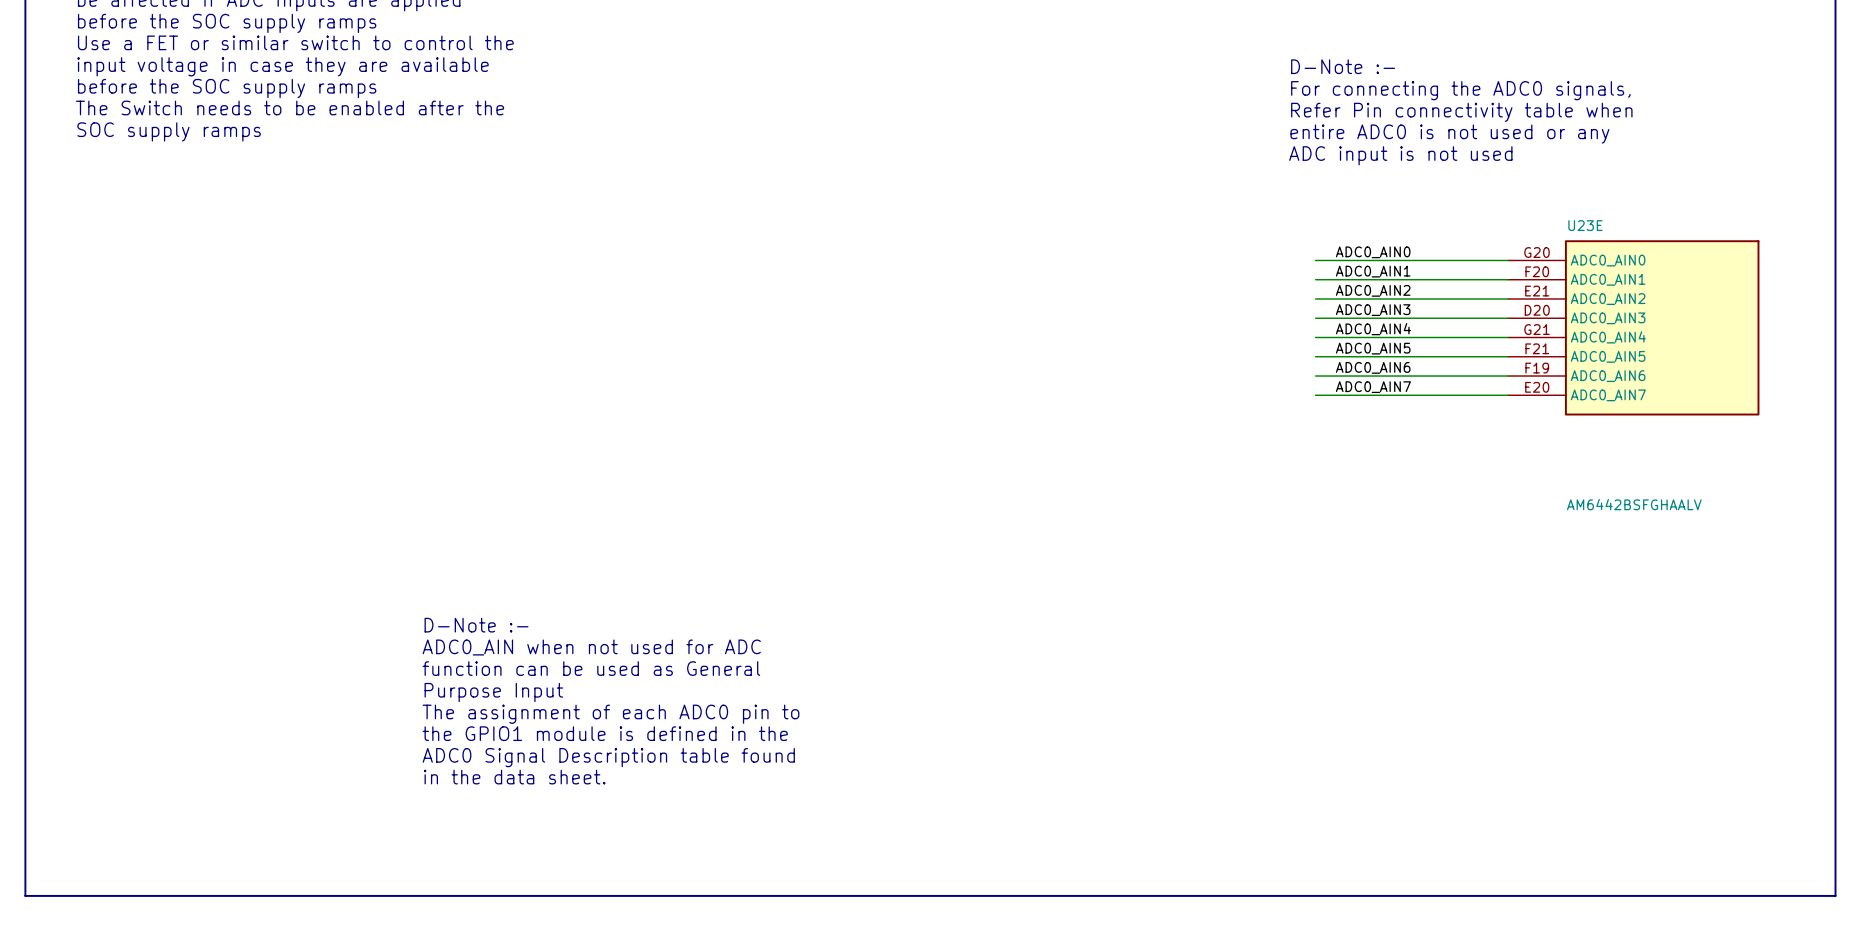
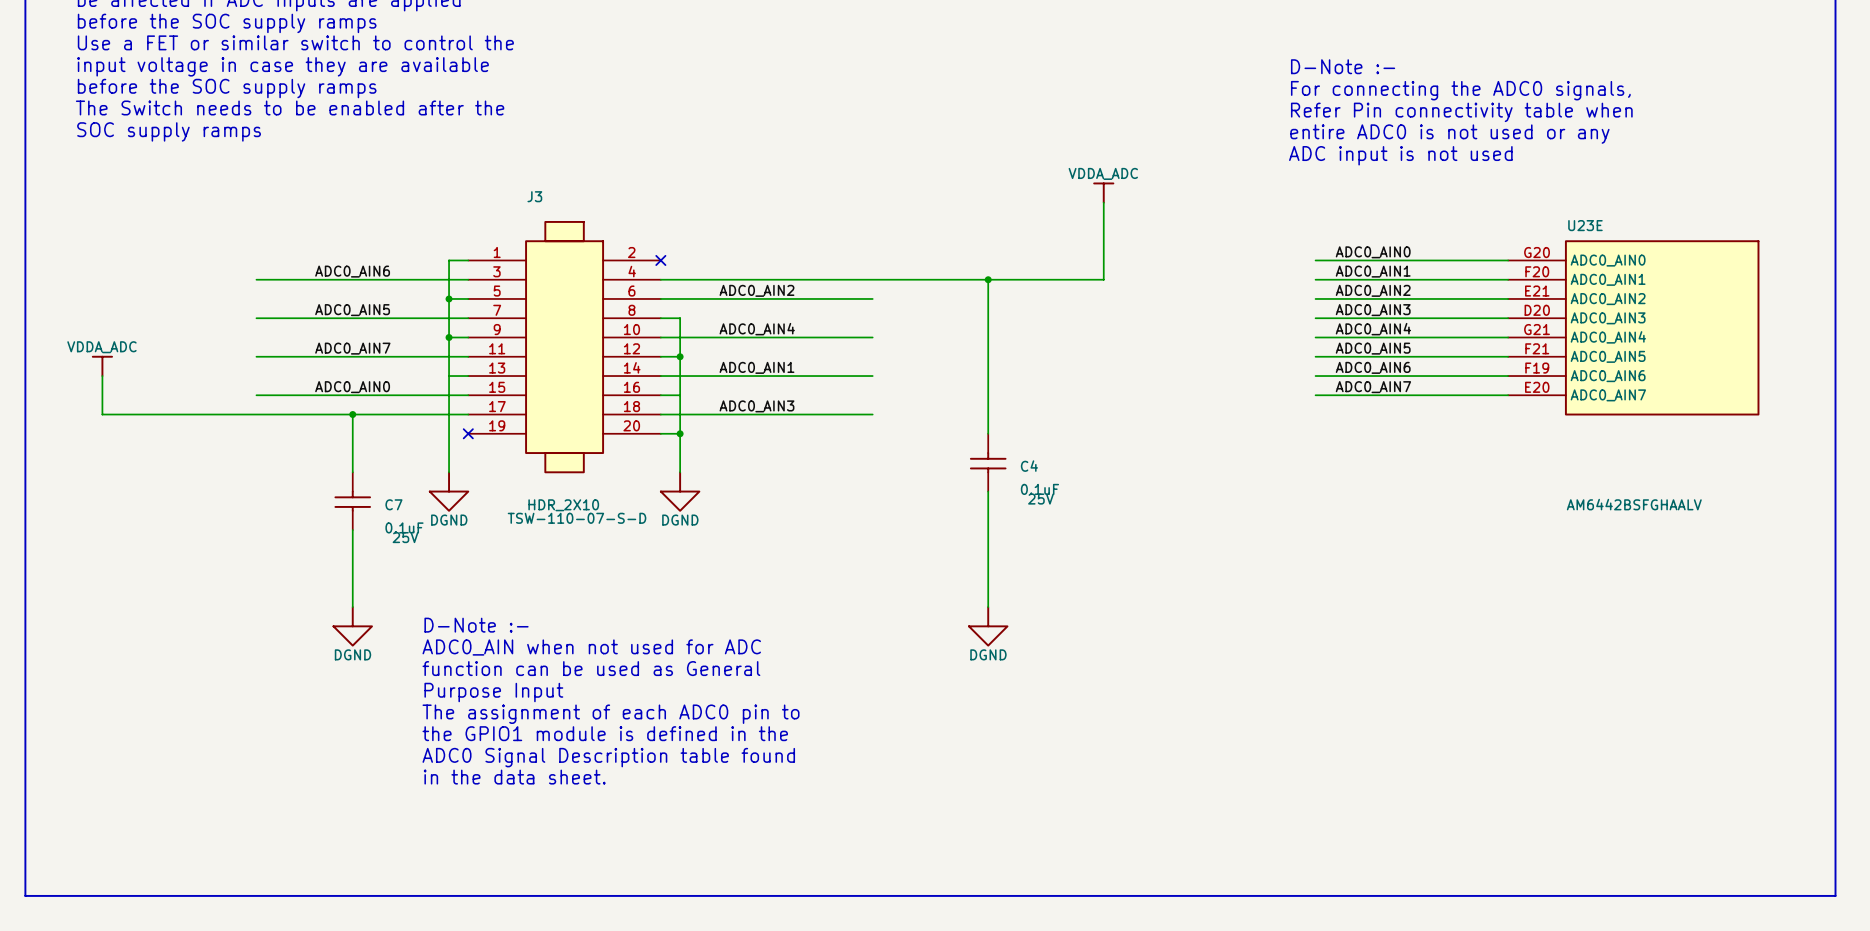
power symbol: none -> VDDA_ADC (1103, 193)
wire: none -> (1103, 202) (1103, 279) (660, 279)
wire: none -> (468, 260) (449, 260) (449, 472)
no-connect mark: none -> (660, 260)
label: none -> ADC0_AIN6 (352, 271)
wire: none -> (256, 279) (468, 279)
wire: none -> (988, 279) (988, 433)
junction: none -> (988, 279)
label: none -> ADC0_AIN2 (756, 290)
wire: none -> (449, 298) (468, 298)
junction: none -> (449, 298)
wire: none -> (660, 298) (872, 298)
label: none -> ADC0_AIN5 (352, 310)
wire: none -> (256, 318) (468, 318)
wire: none -> (660, 318) (680, 318) (680, 472)
label: none -> ADC0_AIN4 (757, 329)
wire: none -> (449, 337) (468, 337)
junction: none -> (449, 337)
wire: none -> (660, 337) (872, 337)
J3: none -> HDR_2X10 (564, 347)
label: none -> ADC0_AIN7 (352, 348)
wire: none -> (256, 356) (468, 356)
wire: none -> (660, 356) (680, 356)
junction: none -> (680, 356)
power symbol: none -> VDDA_ADC (102, 366)
label: none -> ADC0_AIN1 (756, 367)
wire: none -> (102, 376) (102, 414) (468, 414)
wire: none -> (449, 376) (468, 376)
wire: none -> (660, 376) (872, 376)
label: none -> ADC0_AIN0 (352, 387)
wire: none -> (256, 395) (468, 395)
wire: none -> (660, 395) (680, 395)
label: none -> ADC0_AIN3 (756, 406)
wire: none -> (352, 414) (352, 472)
junction: none -> (352, 414)
wire: none -> (660, 414) (872, 414)
no-connect mark: none -> (468, 433)
wire: none -> (660, 433) (680, 433)
junction: none -> (680, 433)
C4: none -> 0.1uF (988, 462)
power symbol: none -> DGND (449, 491)
power symbol: none -> DGND (680, 491)
wire: none -> (988, 491) (988, 607)
C7: none -> 0.1uF (352, 501)
wire: none -> (352, 530) (352, 607)
power symbol: none -> DGND (352, 626)
power symbol: none -> DGND (988, 626)

